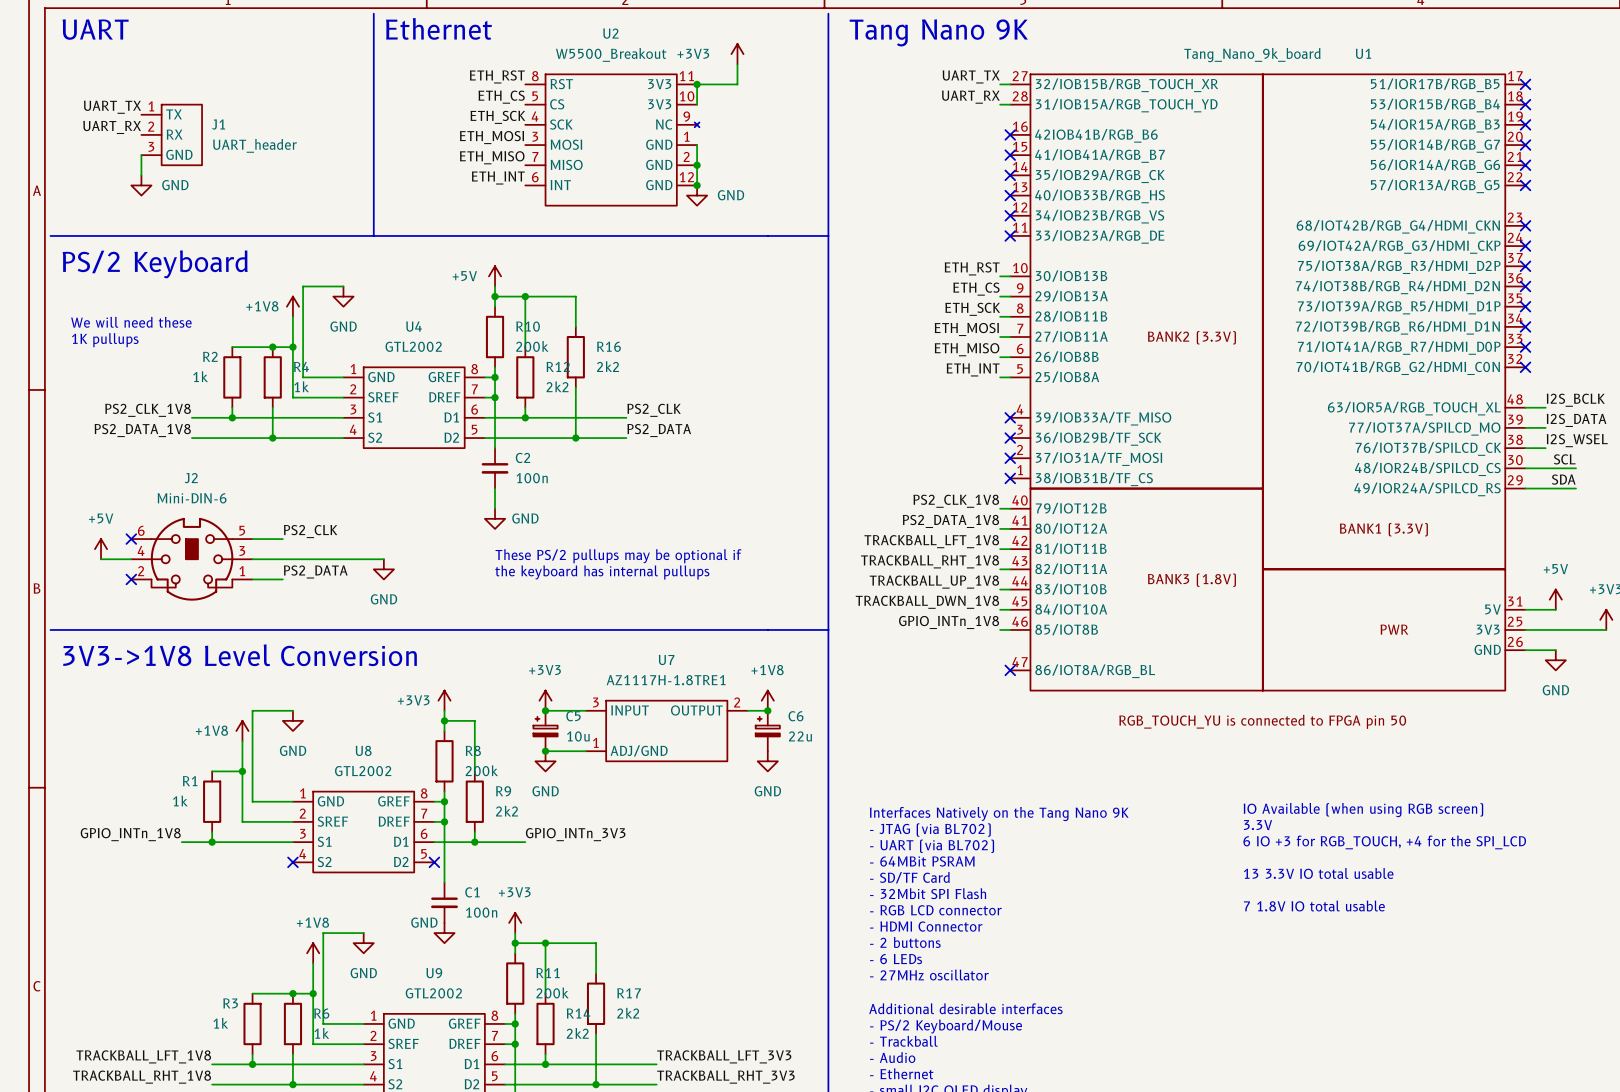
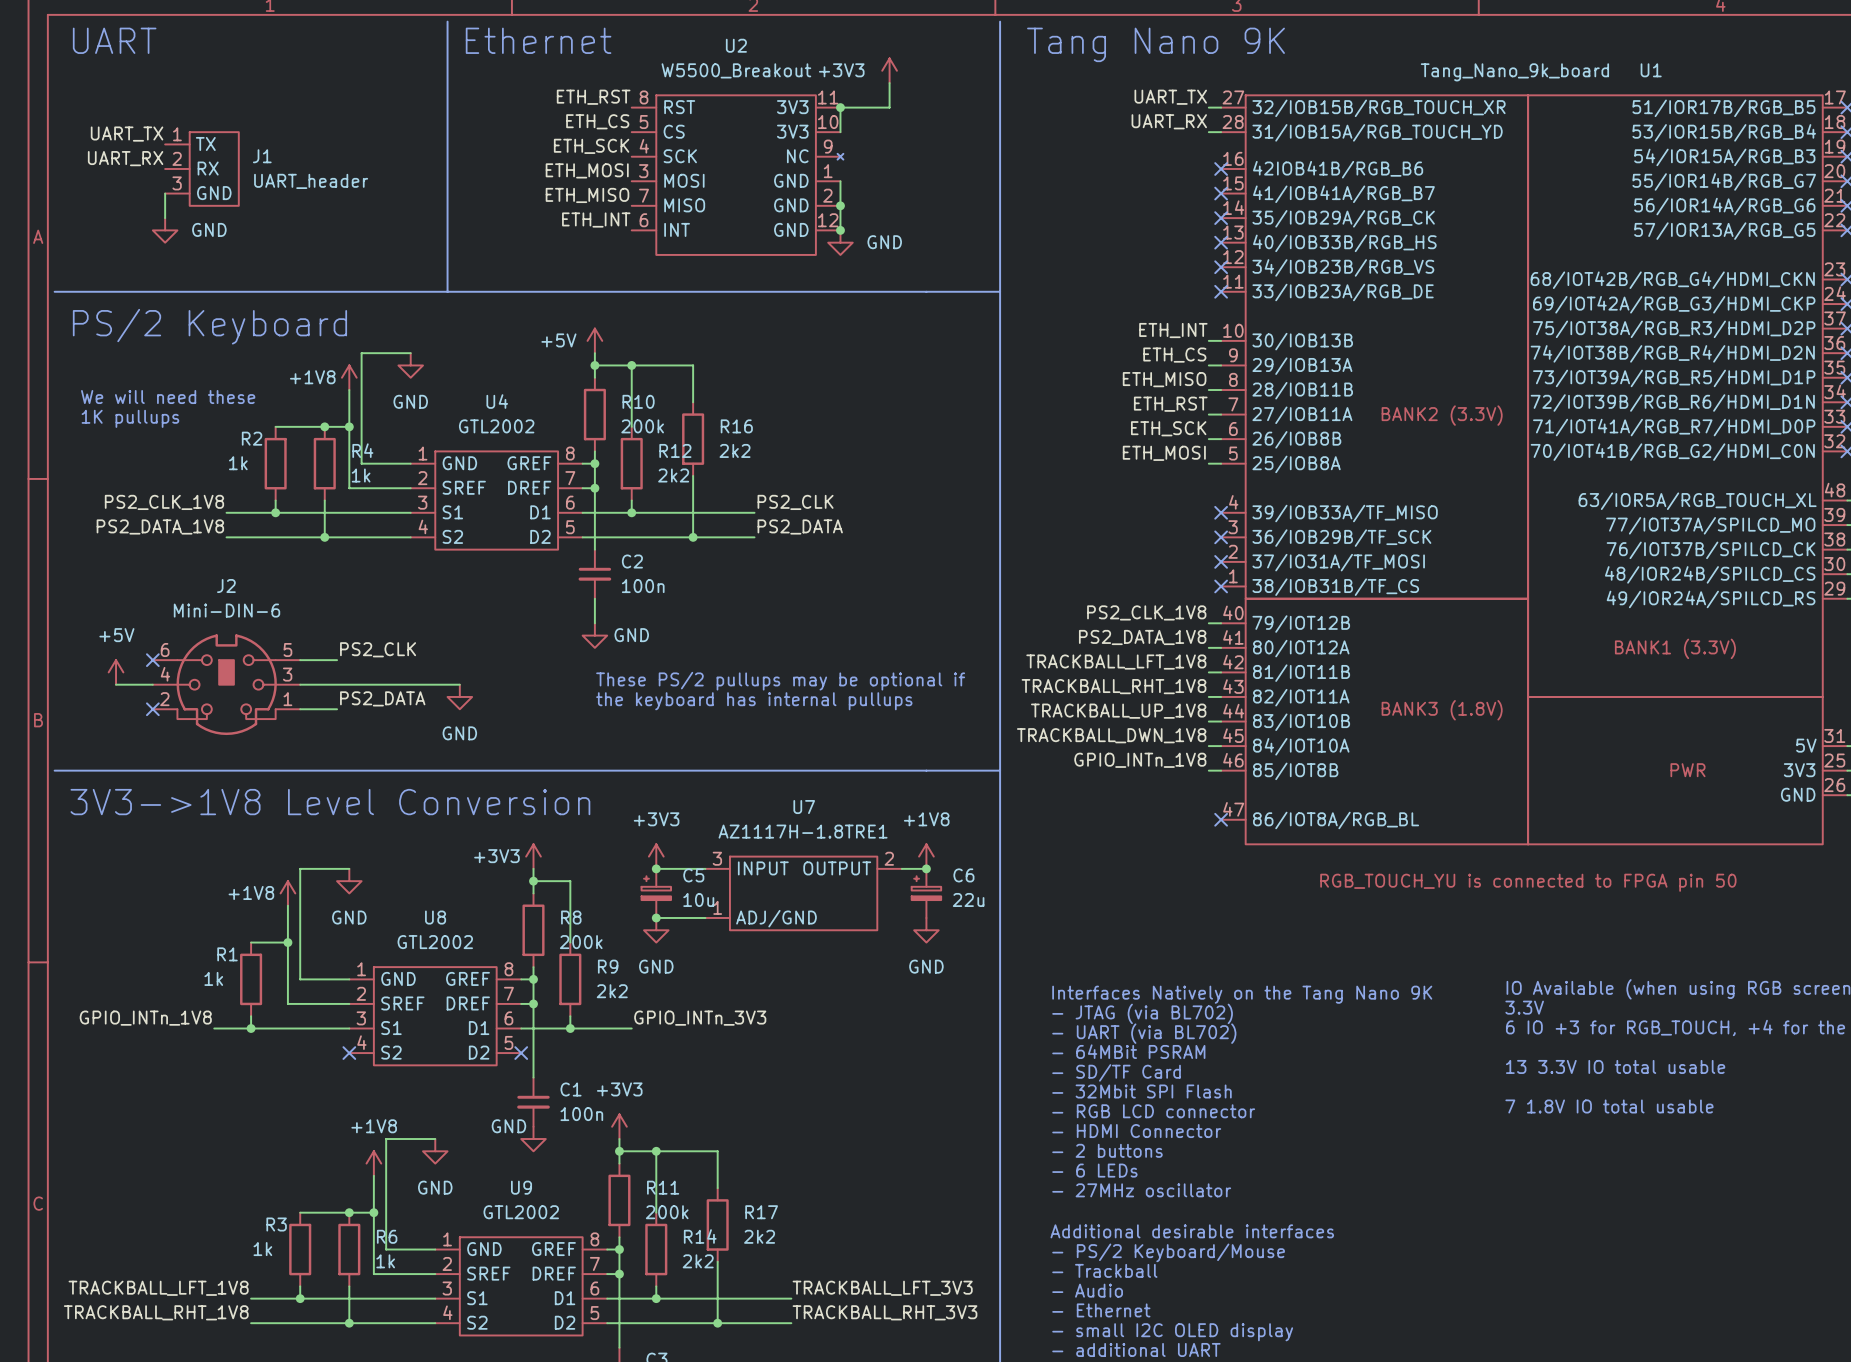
label: ETH_RST (972, 268) -> ETH_INT (1173, 330)
label: ETH_SCK (972, 309) -> ETH_MISO (1164, 379)
label: ETH_MOSI (966, 329) -> ETH_RST (1170, 404)
label: ETH_MISO (967, 349) -> ETH_SCK (1168, 428)
label: ETH_INT (973, 369) -> ETH_MOSI (1164, 453)

